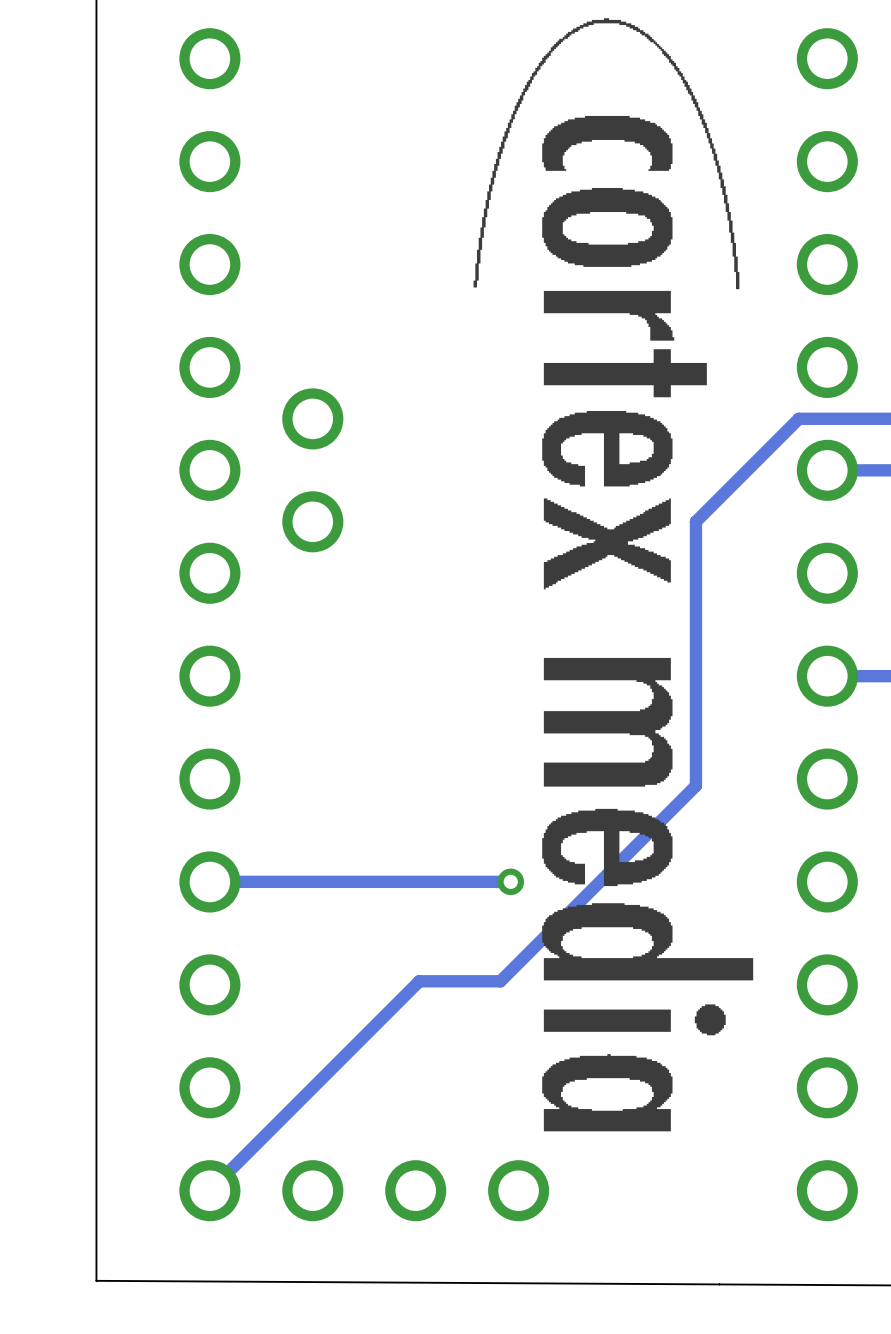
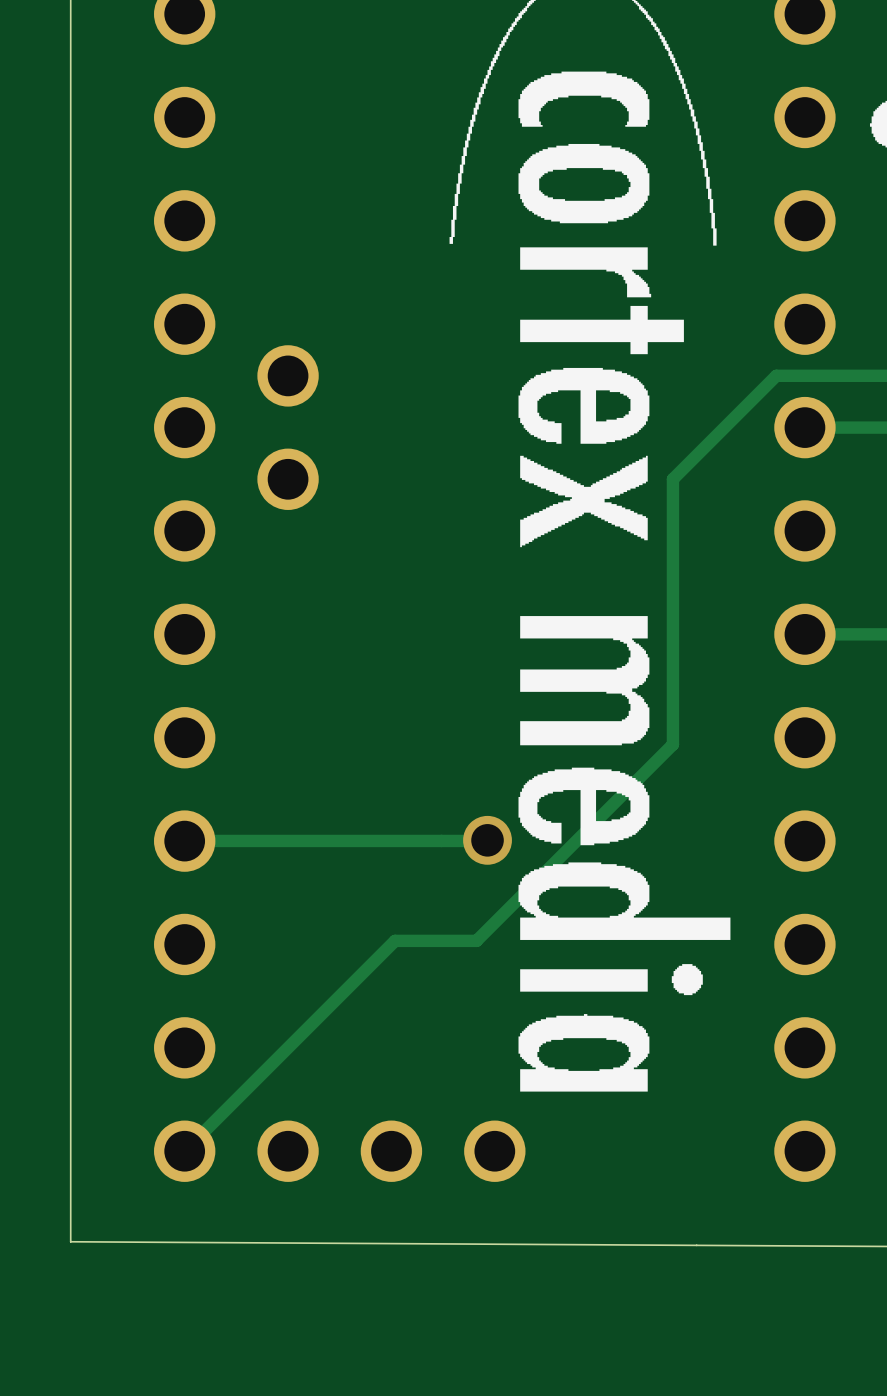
via size: [497, 868, 525, 896] -> [463, 815, 512, 865]

